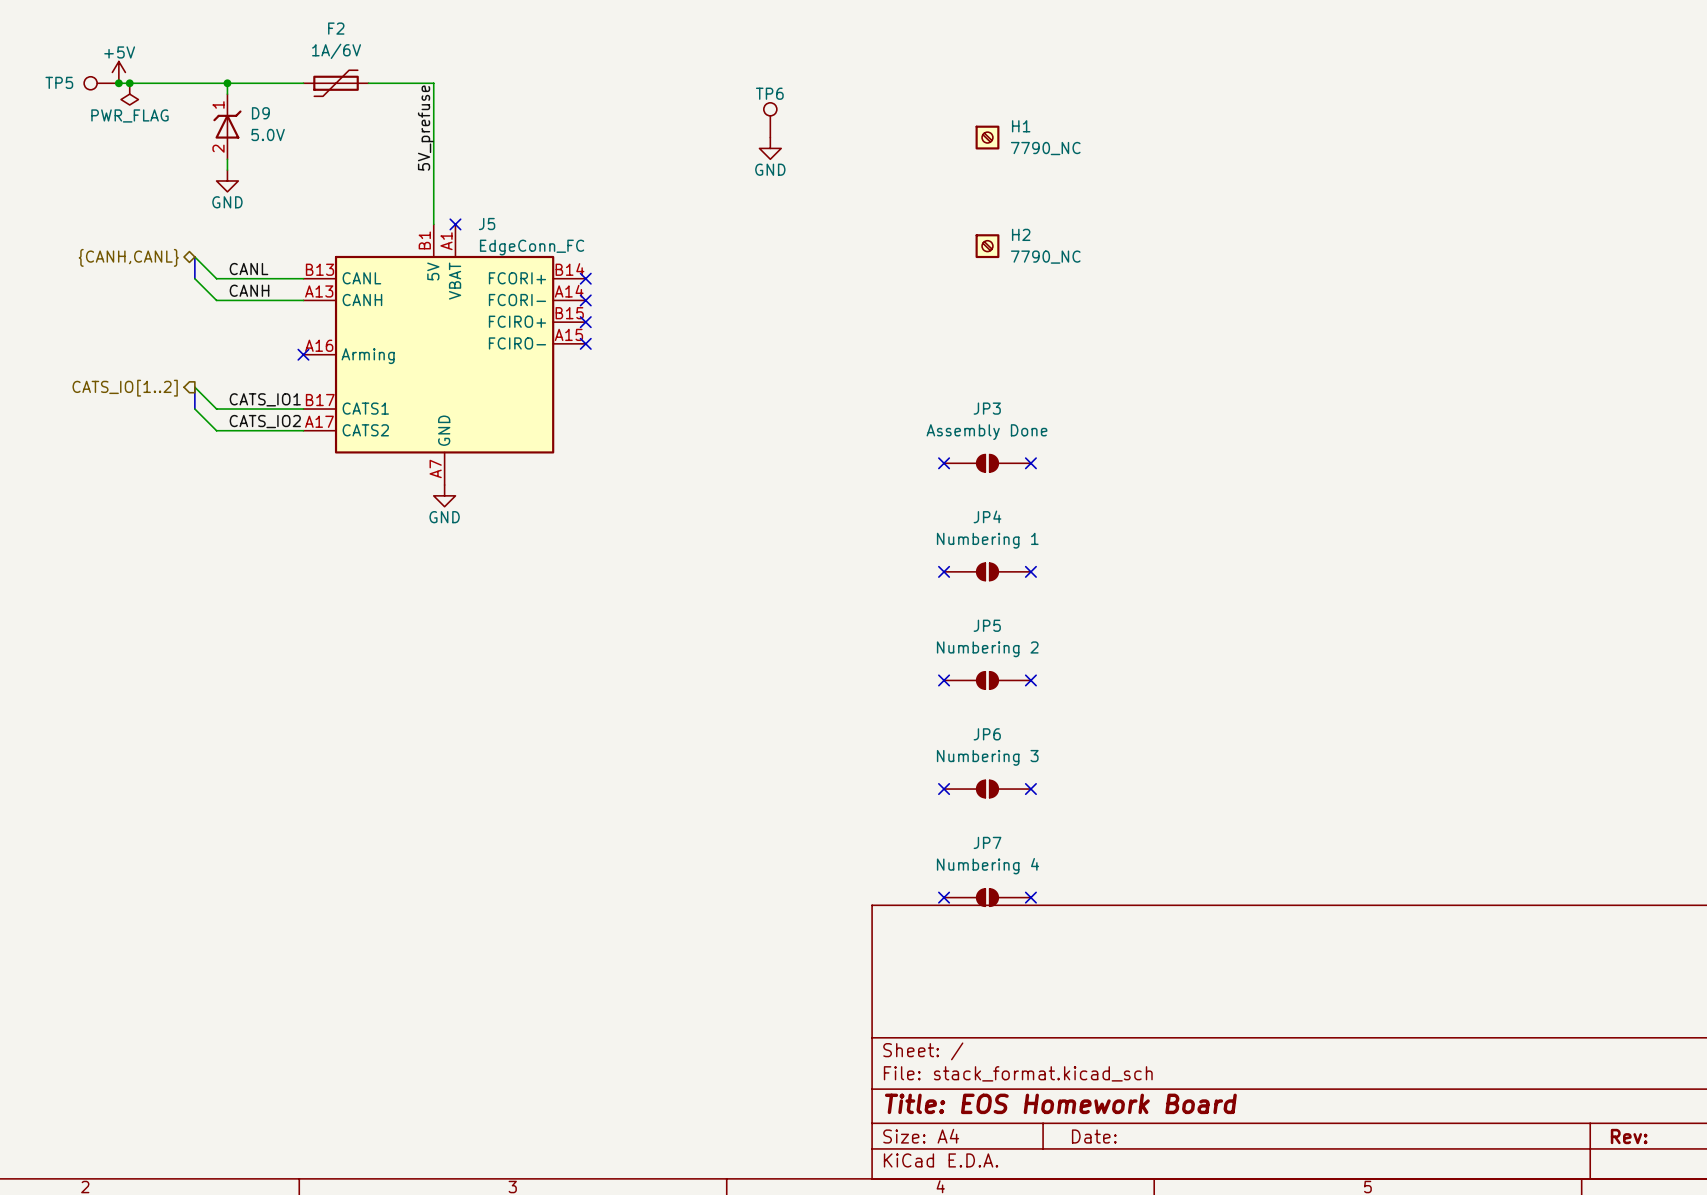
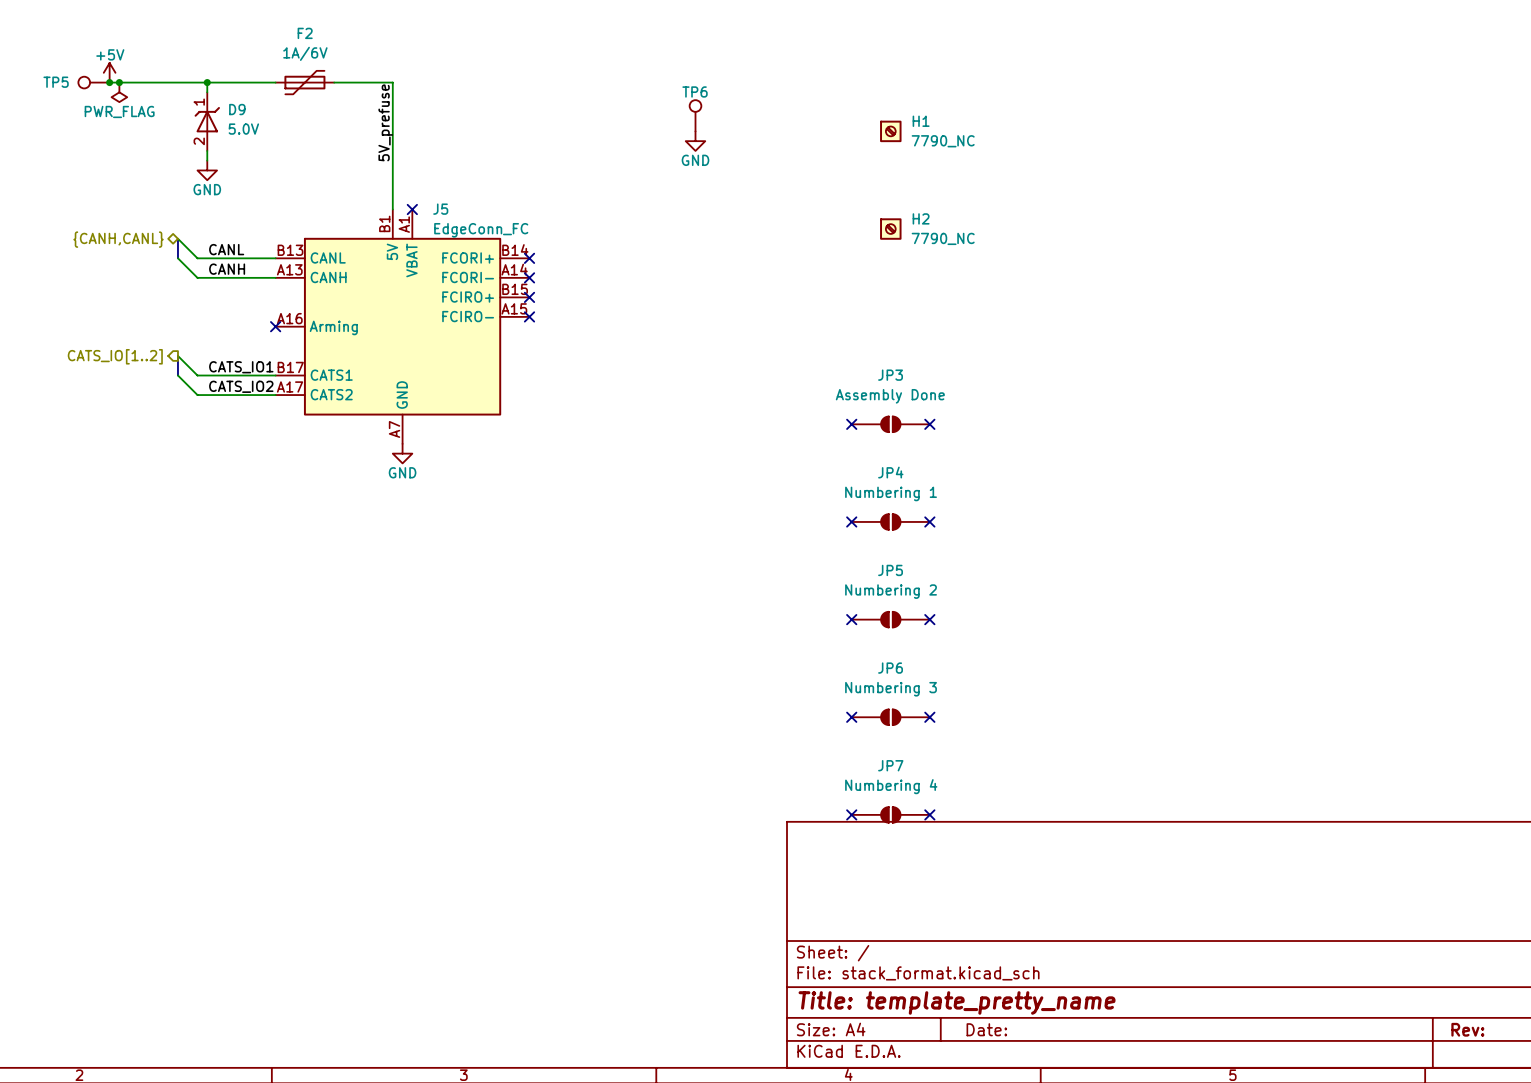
title block: Title: EOS Homework Board (1060, 1103) -> Title: template_pretty_name (957, 1002)

